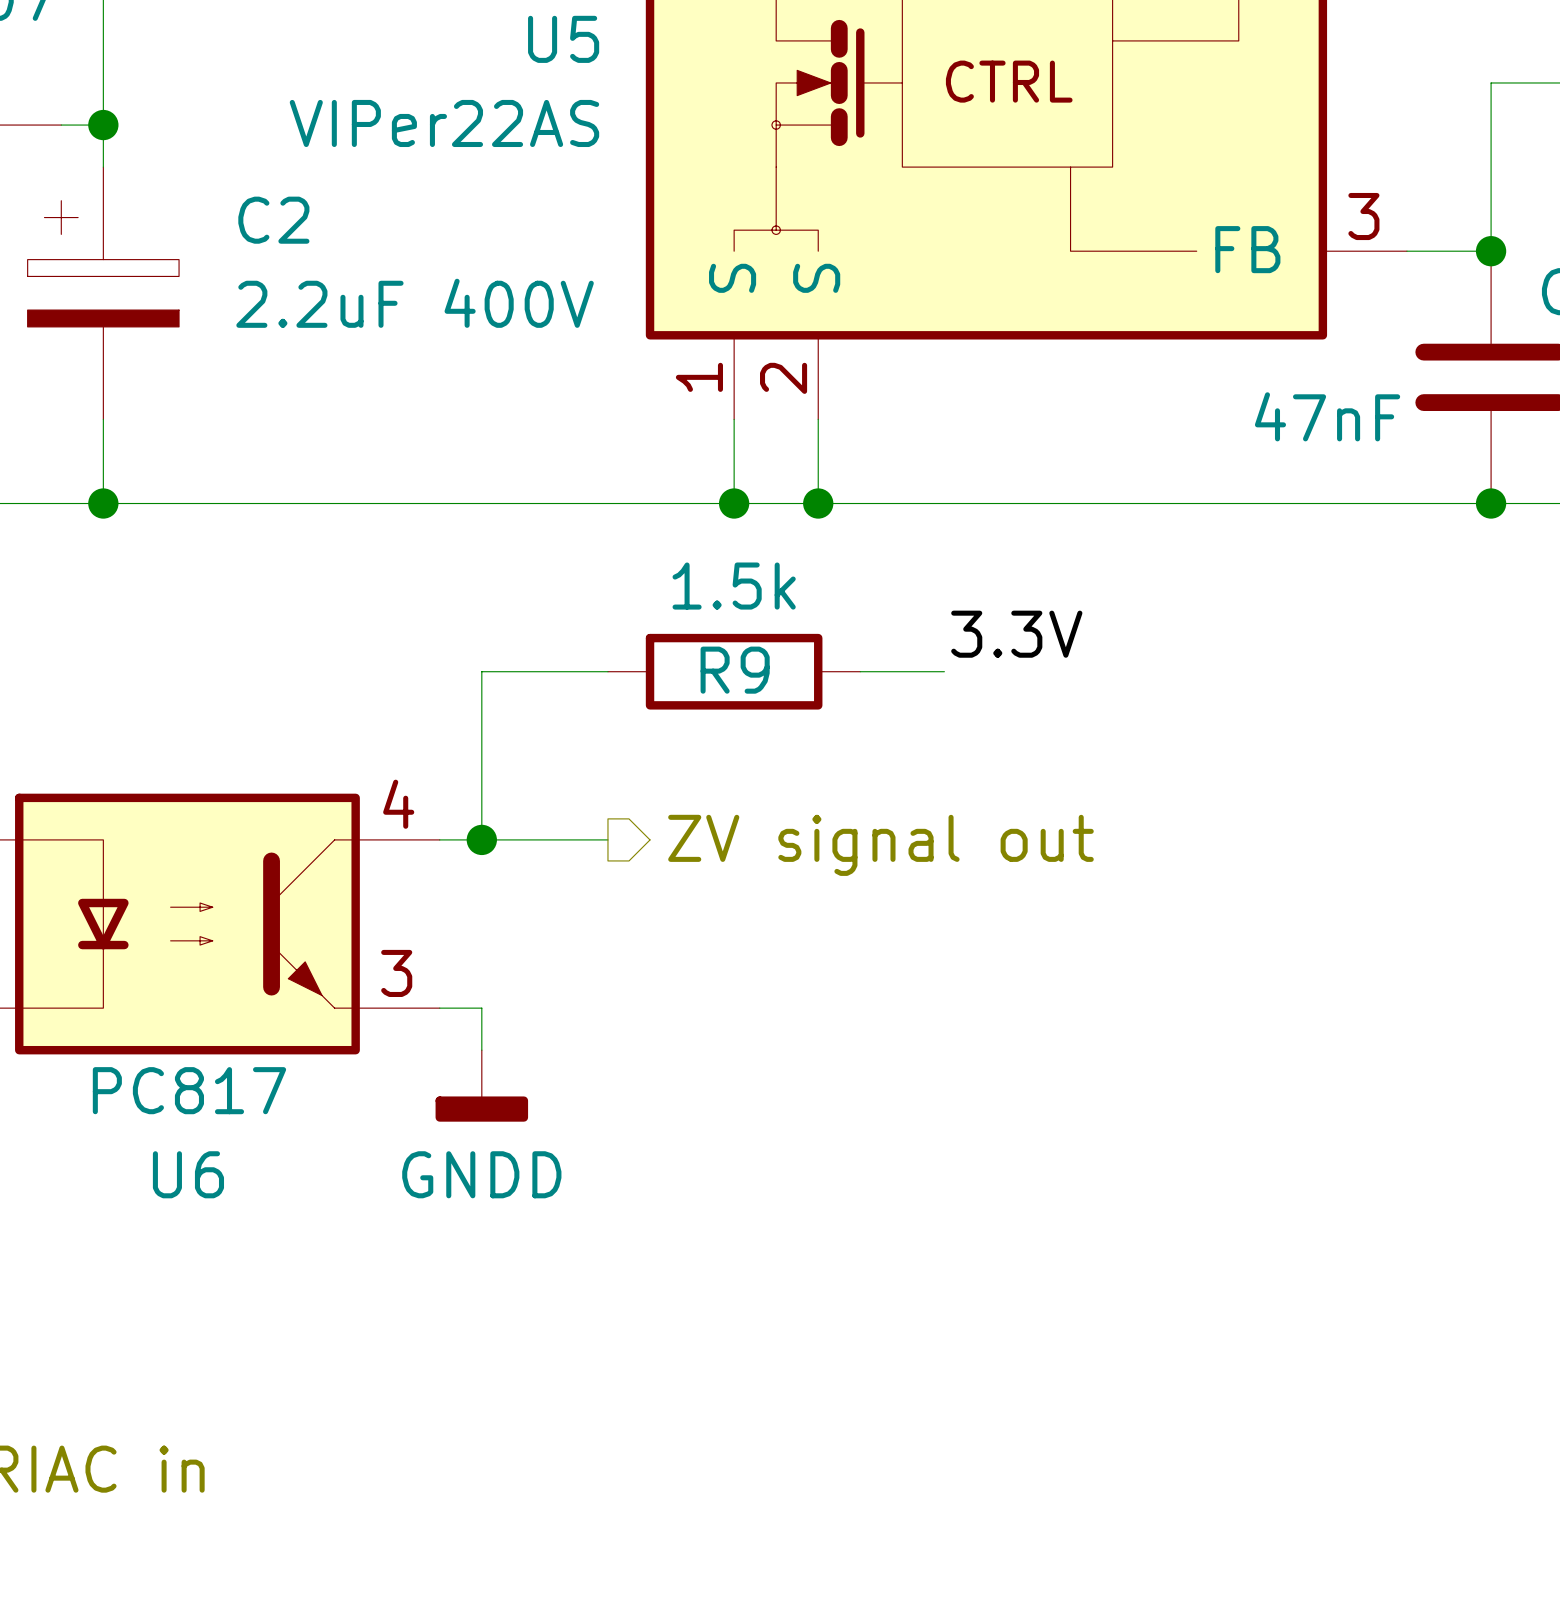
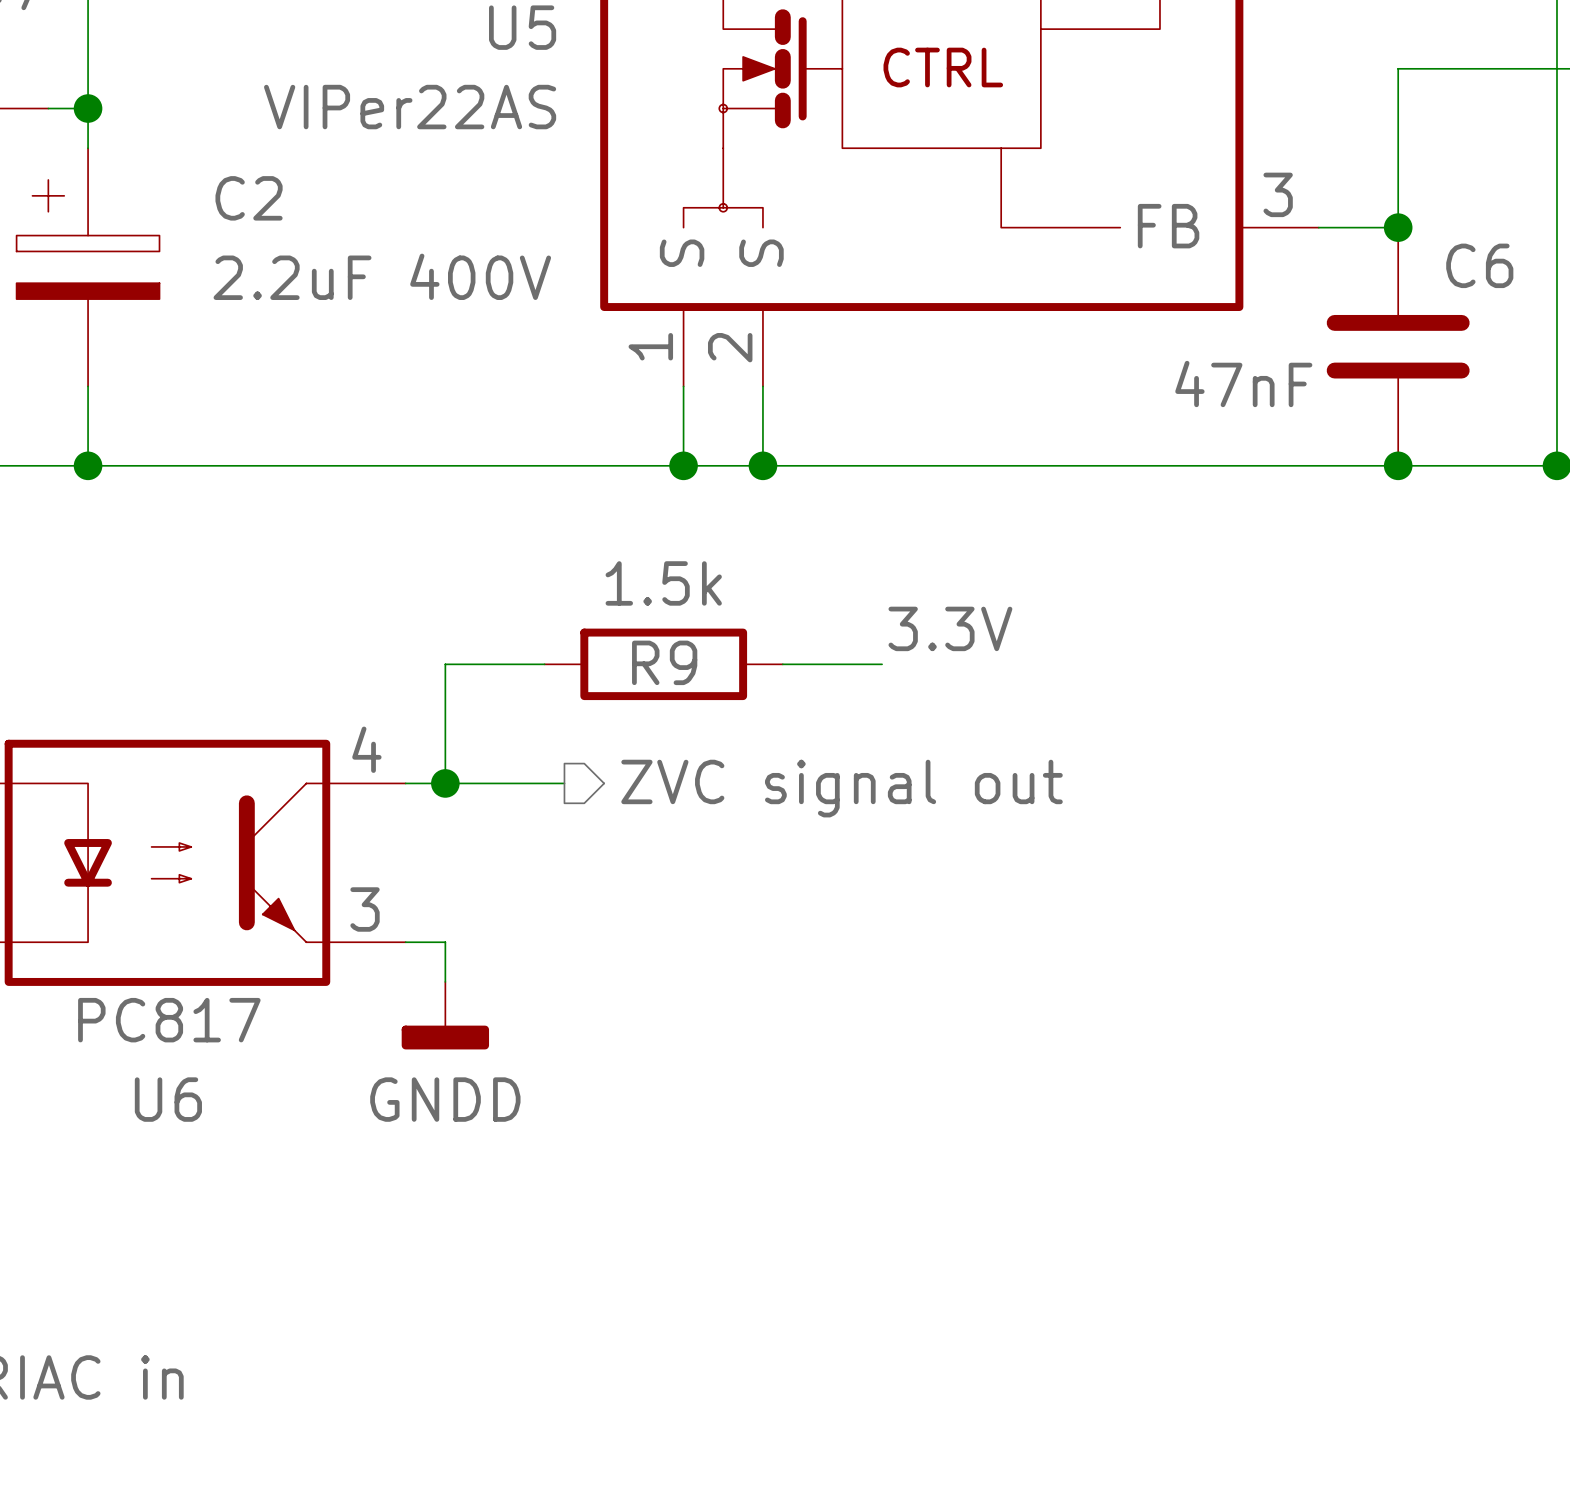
label position: 3.3V (1016, 634) -> 3.3V (950, 628)
wire: (607, 671) (481, 671) (481, 713) -> (544, 664) (445, 664)
R9 position: (734, 671) -> (663, 664)
wire: (860, 671) (944, 671) -> none
wire: none -> (782, 664) (882, 664)
hierarchical label: ZV signal out (880, 845) -> ZVC signal out (842, 788)

